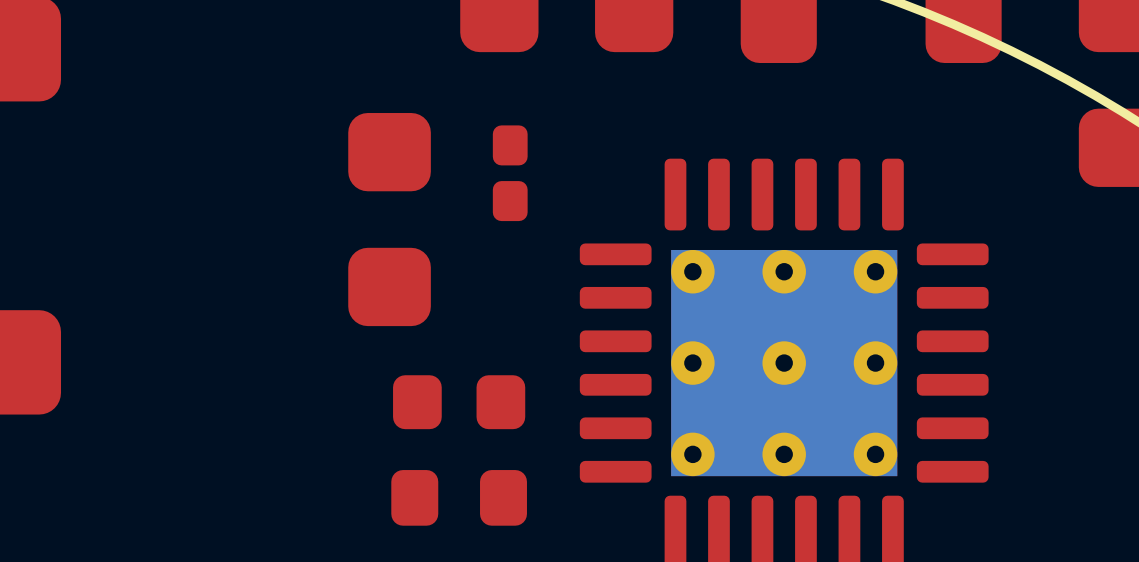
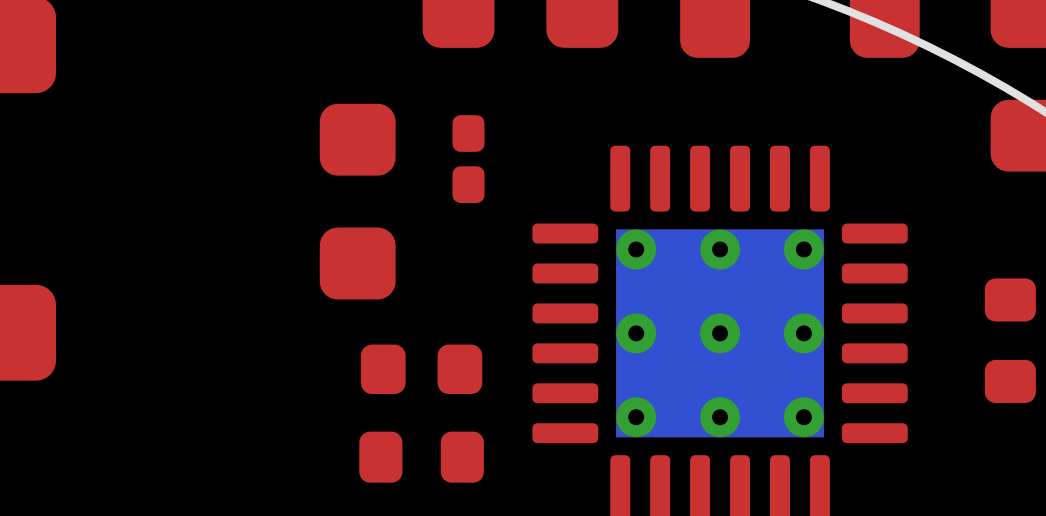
part: none -> (1010, 340)

